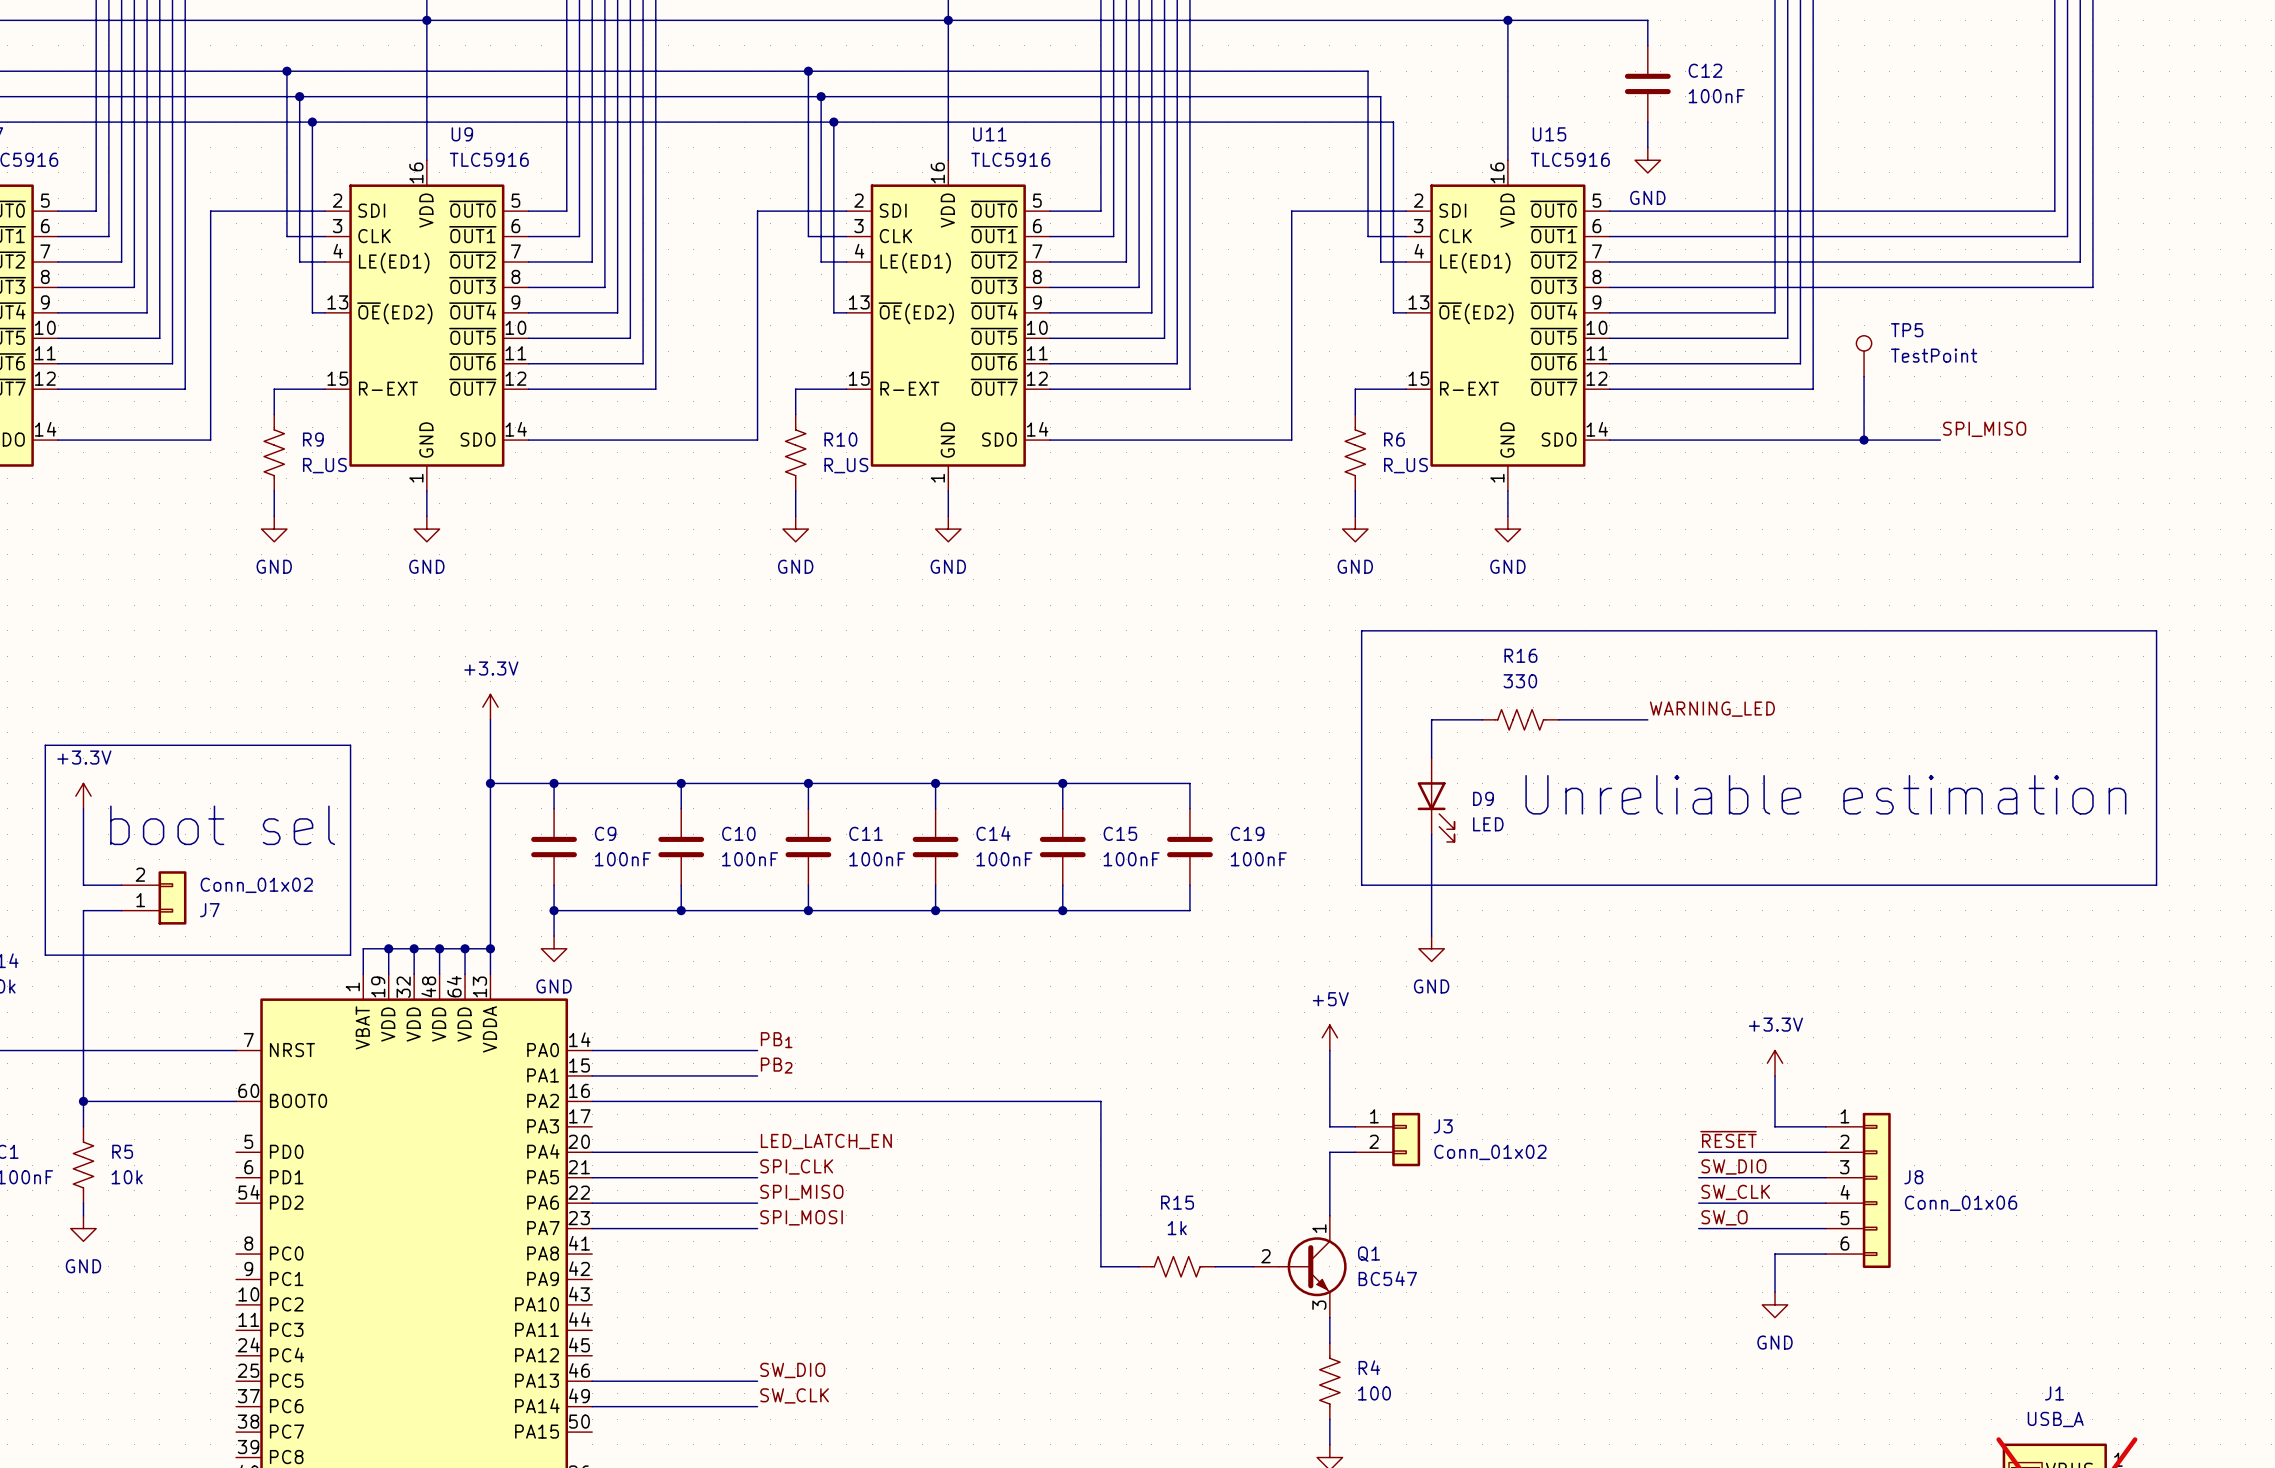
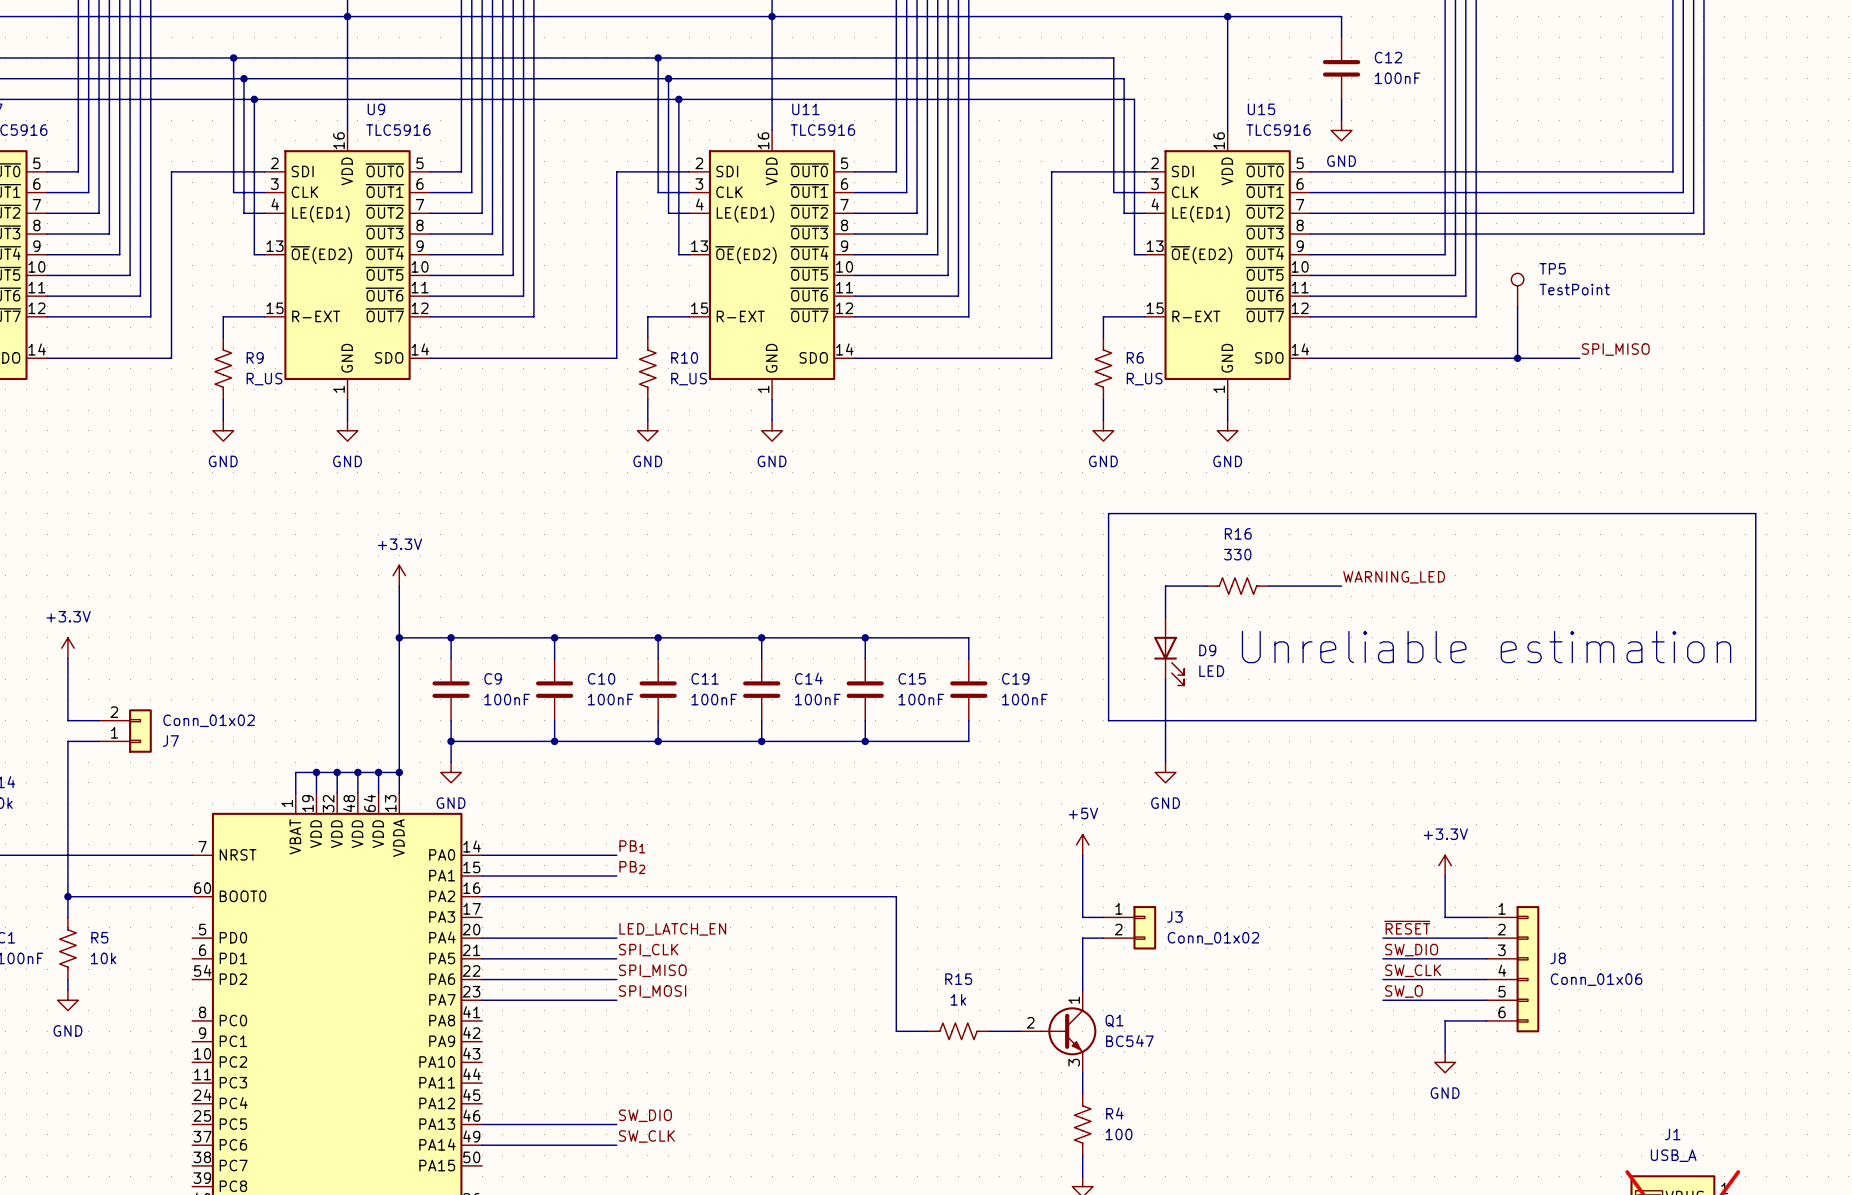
line: (45, 745) (350, 745) (350, 955) (45, 955) (45, 745) -> none
text: boot sel (222, 825) -> none

